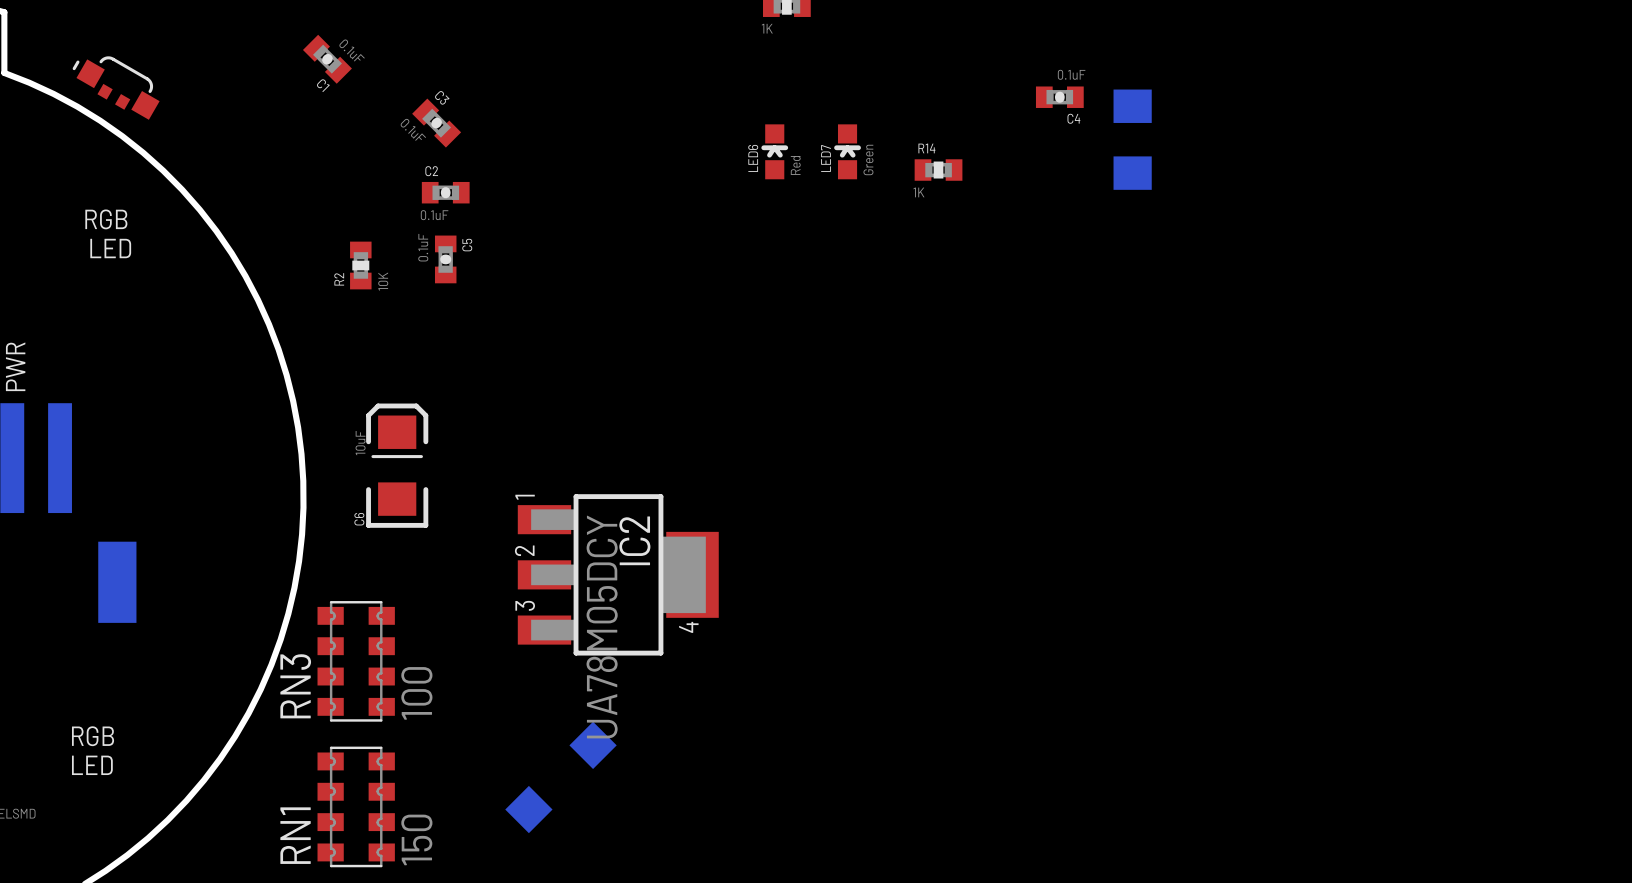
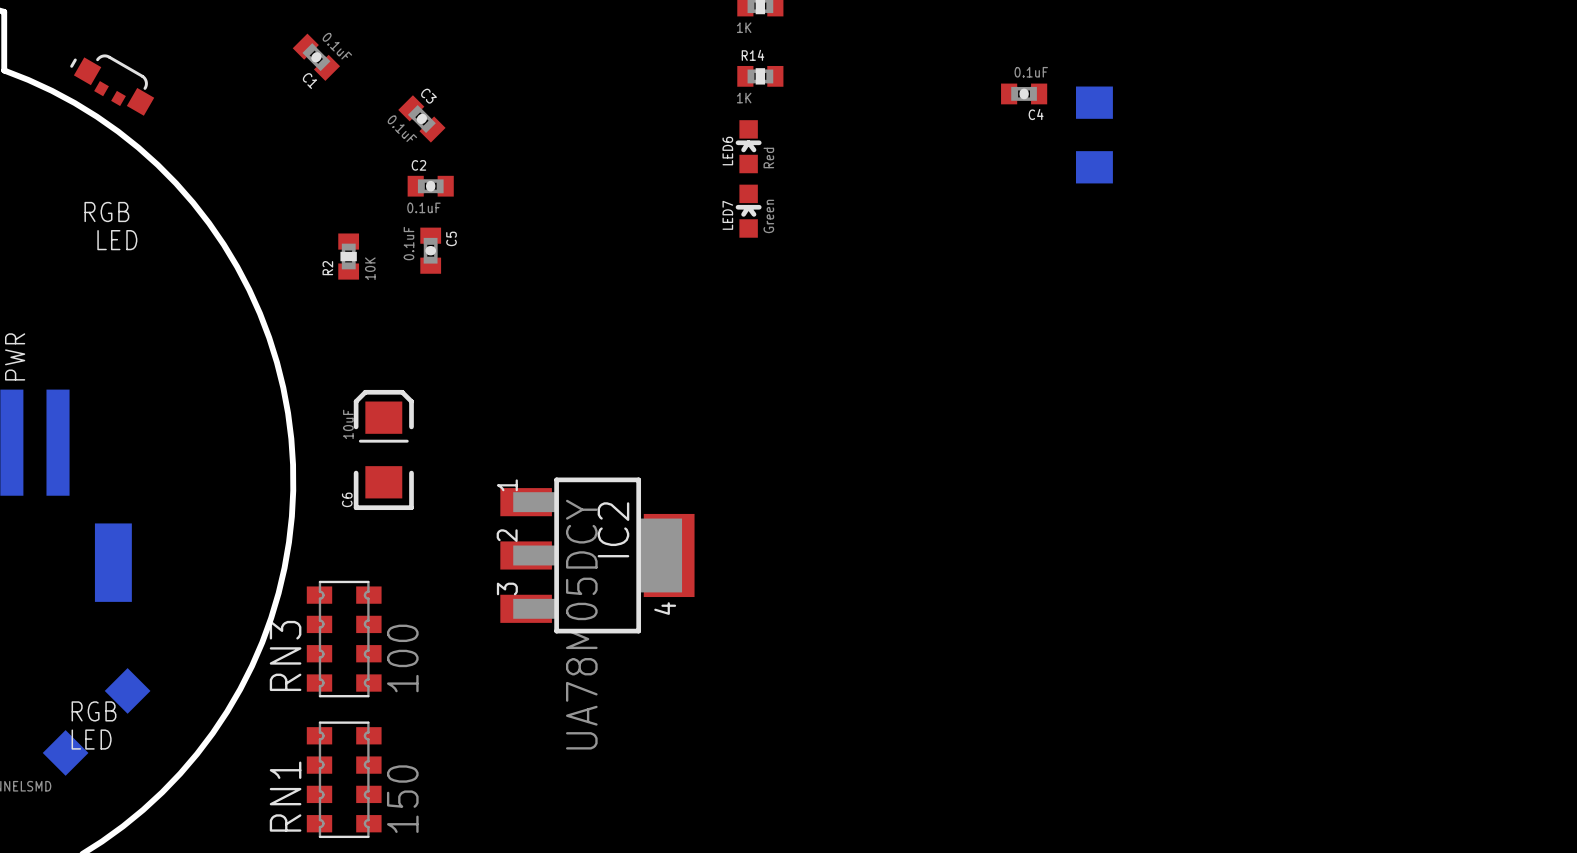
LED7 position: (847, 151) -> (748, 211)
R14 position: (938, 170) -> (760, 76)
part position: (560, 777) -> (96, 721)

